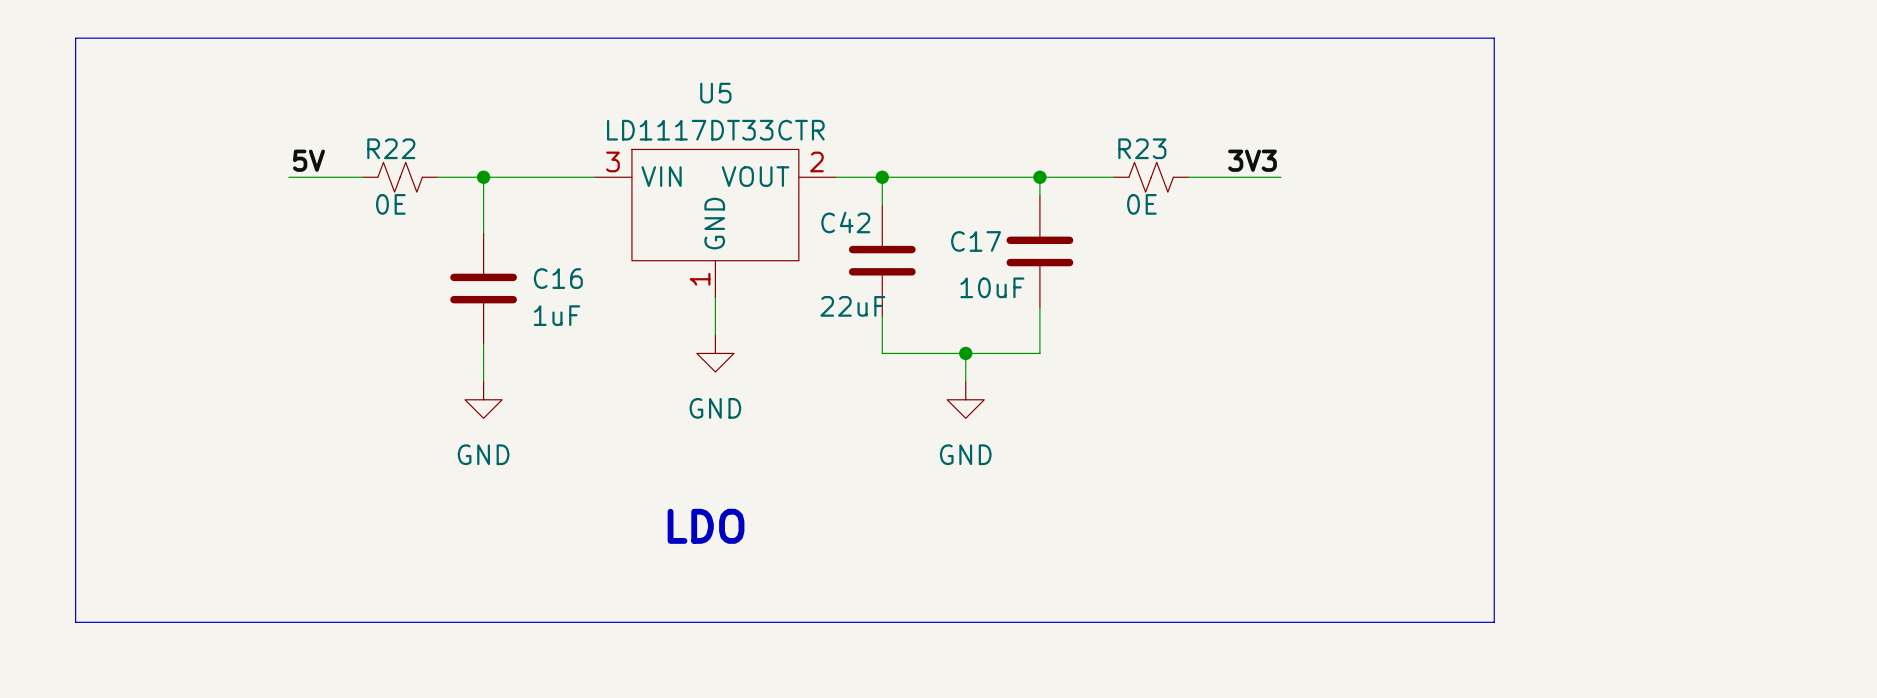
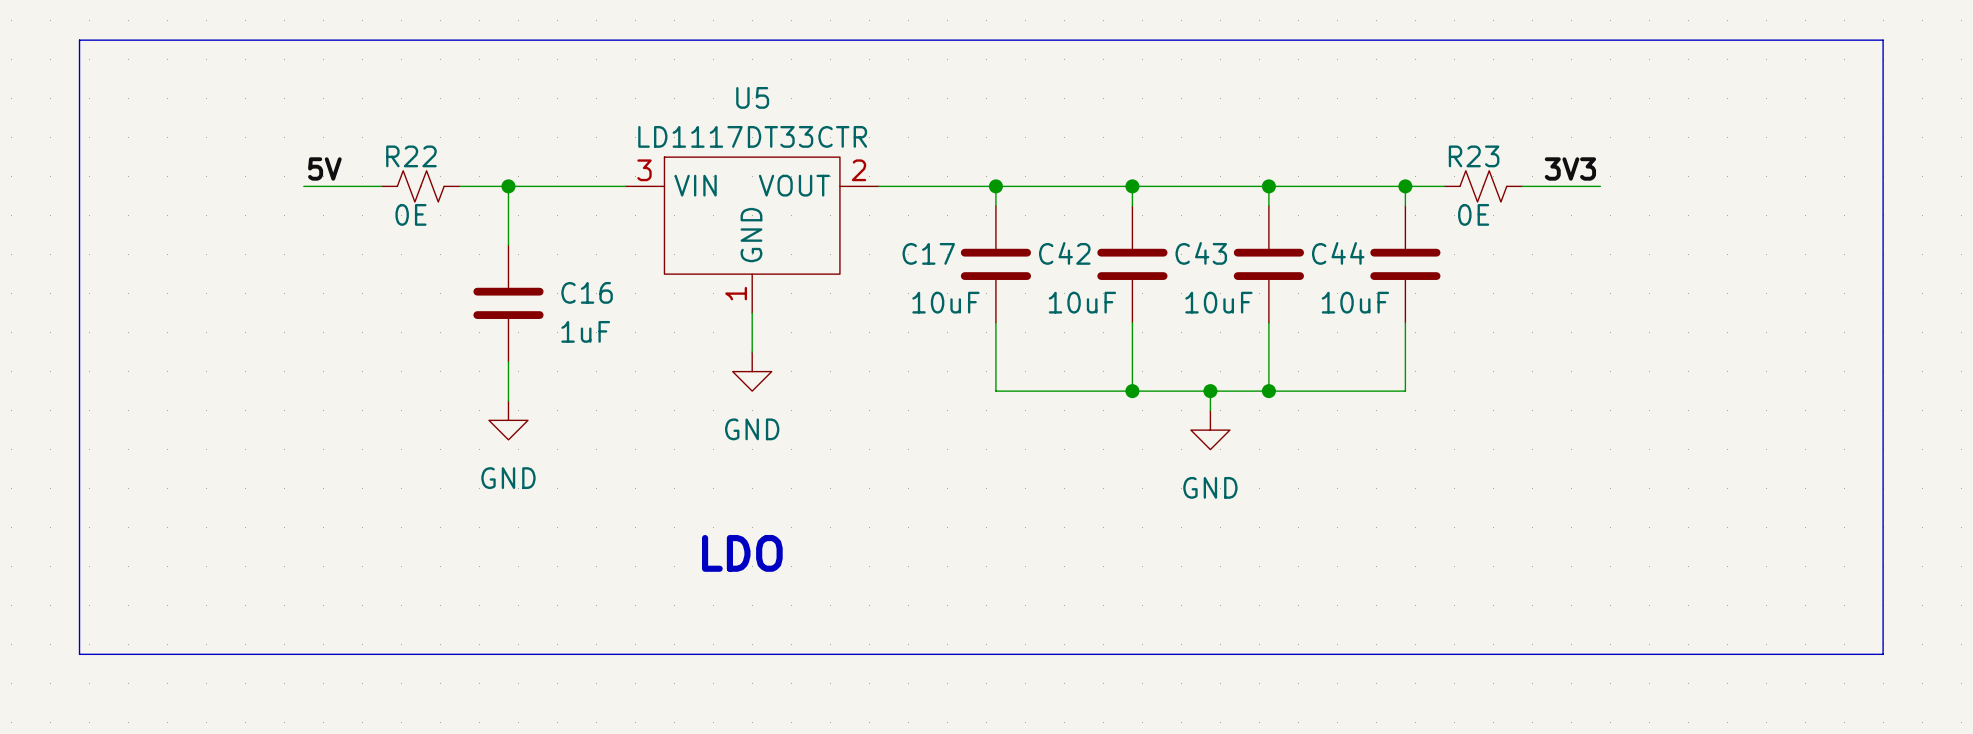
bus: (1494, 38) (1494, 622) -> (1571, 40) (1883, 40) (1883, 654) (1571, 654)
label position: 3V3 (1252, 160) -> 3V3 (1570, 168)
wire: (882, 177) (882, 205) -> none
junction: (882, 177) -> none
wire: none -> (995, 186) (995, 205)
junction: none -> (995, 186)
wire: (1039, 177) (1039, 195) -> (1132, 186) (1132, 205)
junction position: (1039, 177) -> (1132, 186)
wire: none -> (1171, 186) (1249, 186)
R23 position: (1151, 177) -> (1483, 186)
wire: none -> (1268, 186) (1268, 205)
junction: none -> (1268, 186)
wire: none -> (1346, 186) (1444, 186)
wire: none -> (1405, 186) (1405, 205)
junction: none -> (1405, 186)
wire: none -> (1522, 186) (1600, 186)
C42 name position: C42 (845, 222) -> C42 (1064, 253)
C17 position: (1039, 251) -> (995, 264)
C43: none -> 10uF (1268, 264)
C44: none -> 10uF (1405, 264)
C42 position: (882, 260) -> (1132, 264)
C42 value: 22uF (852, 306) -> 10uF (1082, 302)
wire: none -> (995, 322) (995, 391) (1405, 391) (1405, 322)
wire: (1039, 307) (1039, 353) (882, 353) (882, 316) -> none
wire: none -> (1132, 322) (1132, 391)
wire: none -> (1268, 322) (1268, 391)
wire: (965, 353) (965, 381) -> none
junction: (965, 353) -> none
junction: none -> (1132, 391)
wire: none -> (1210, 391) (1210, 410)
junction: none -> (1210, 391)
junction: none -> (1268, 391)
power symbol position: GND (965, 399) -> GND (1210, 430)

